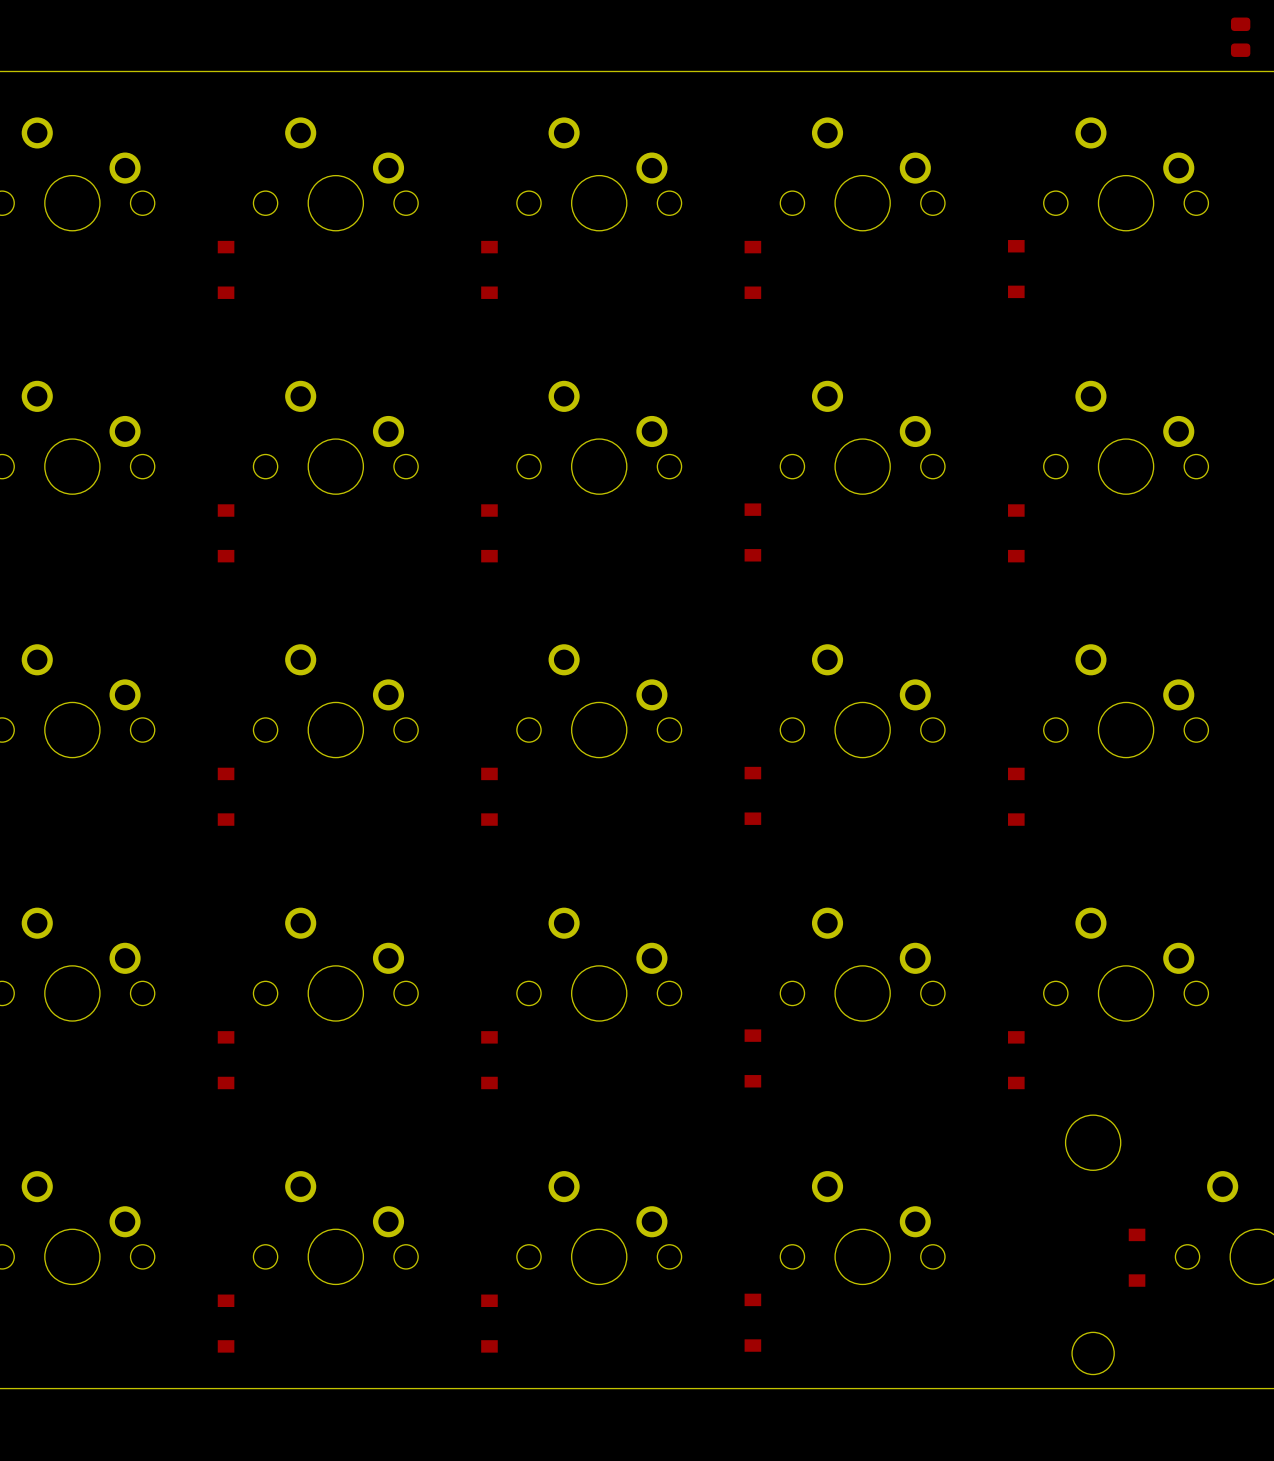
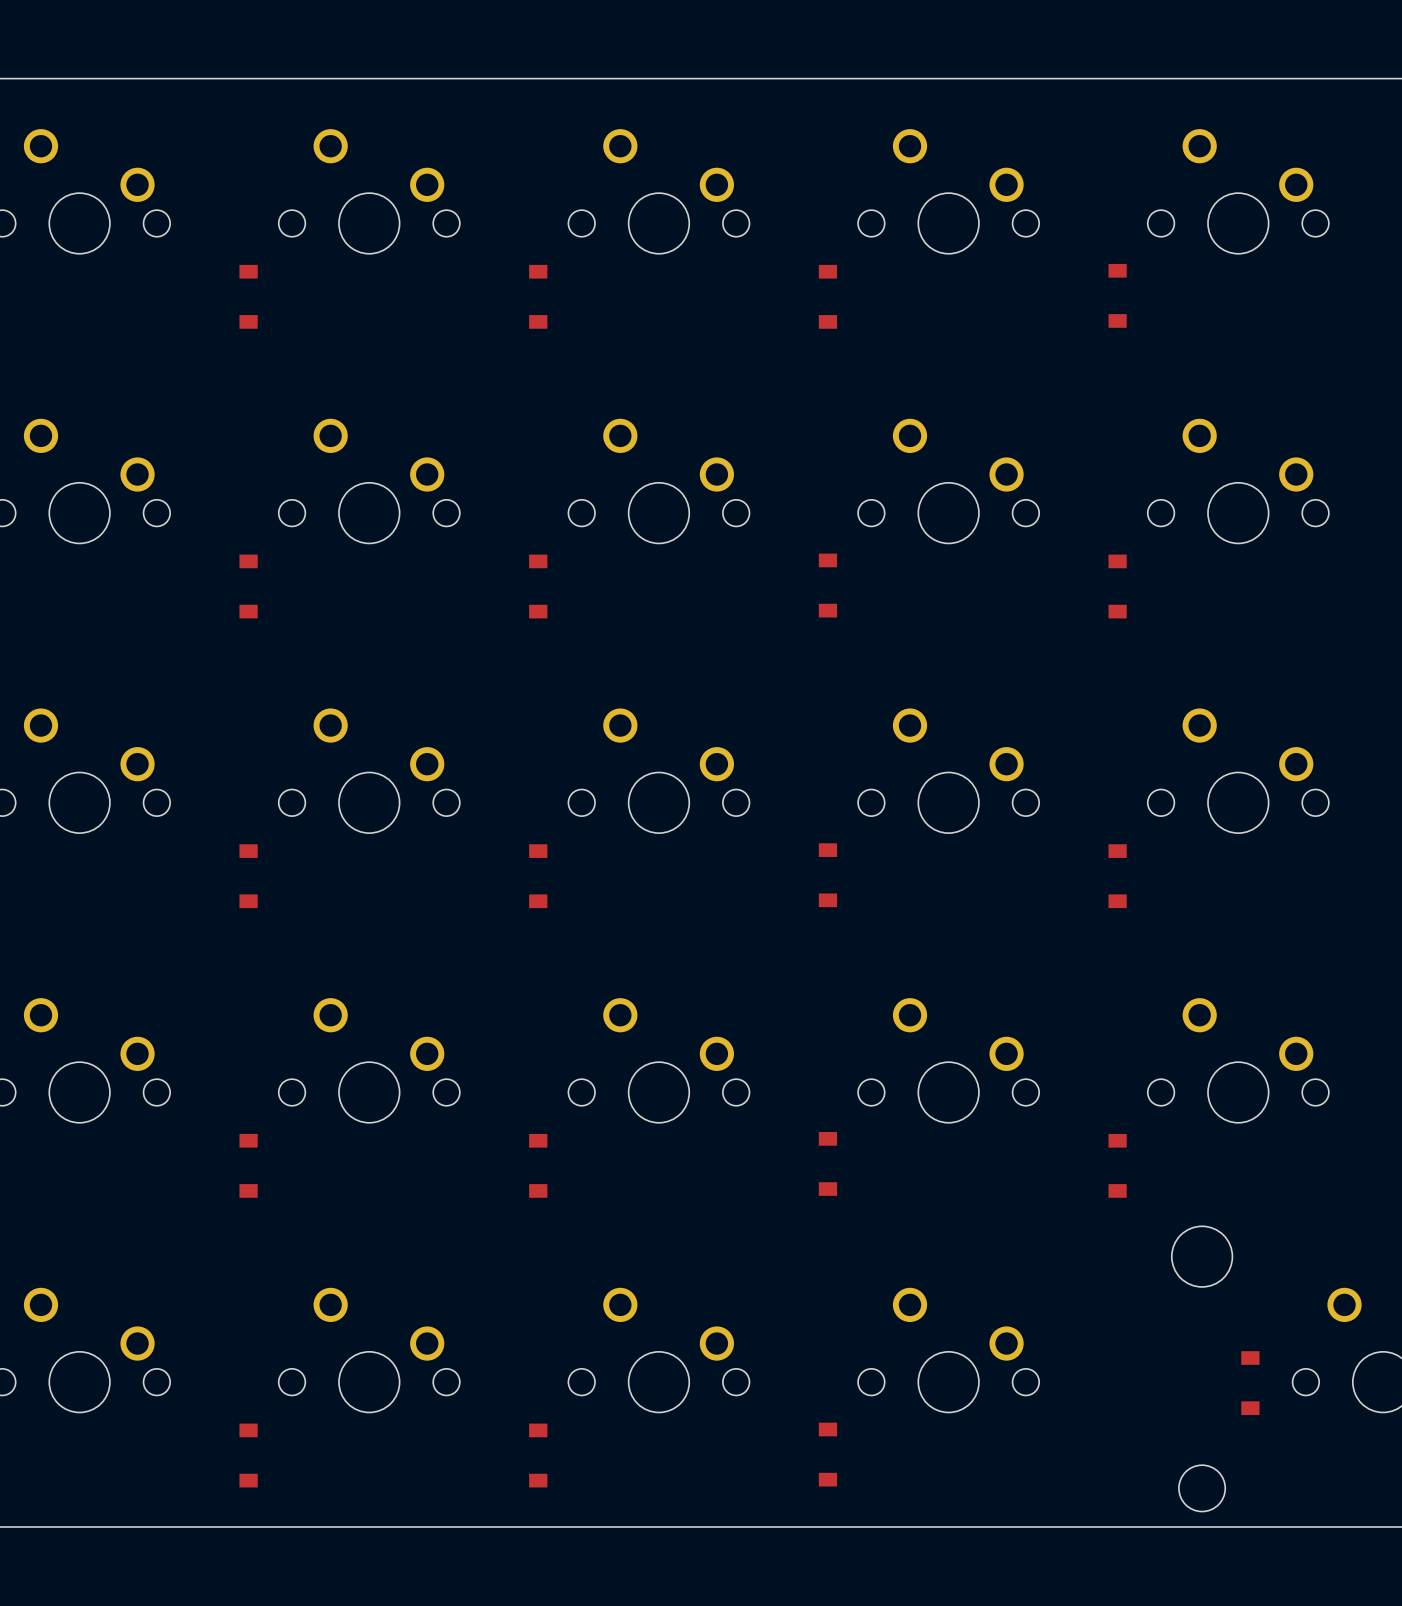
part: (1240, 37) -> none

